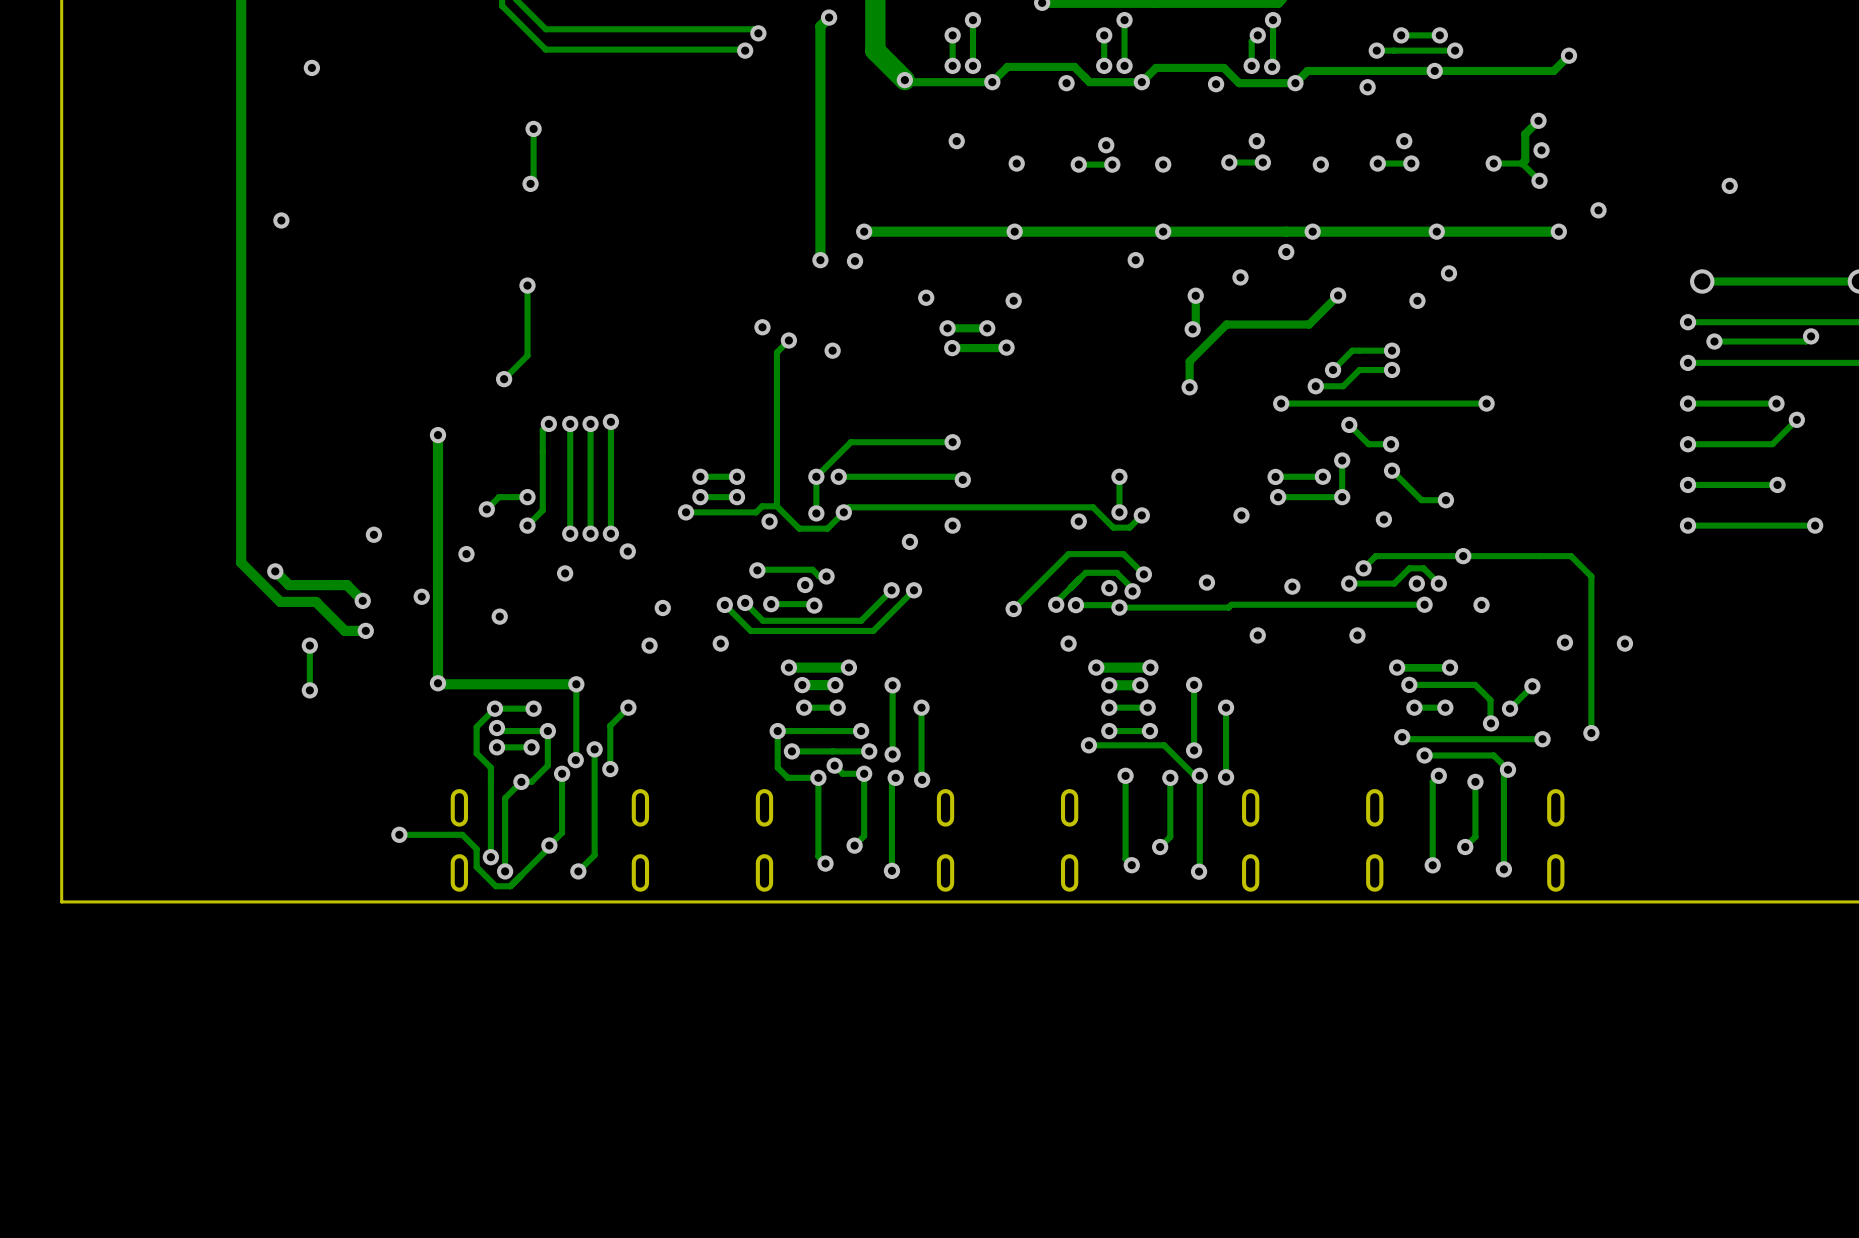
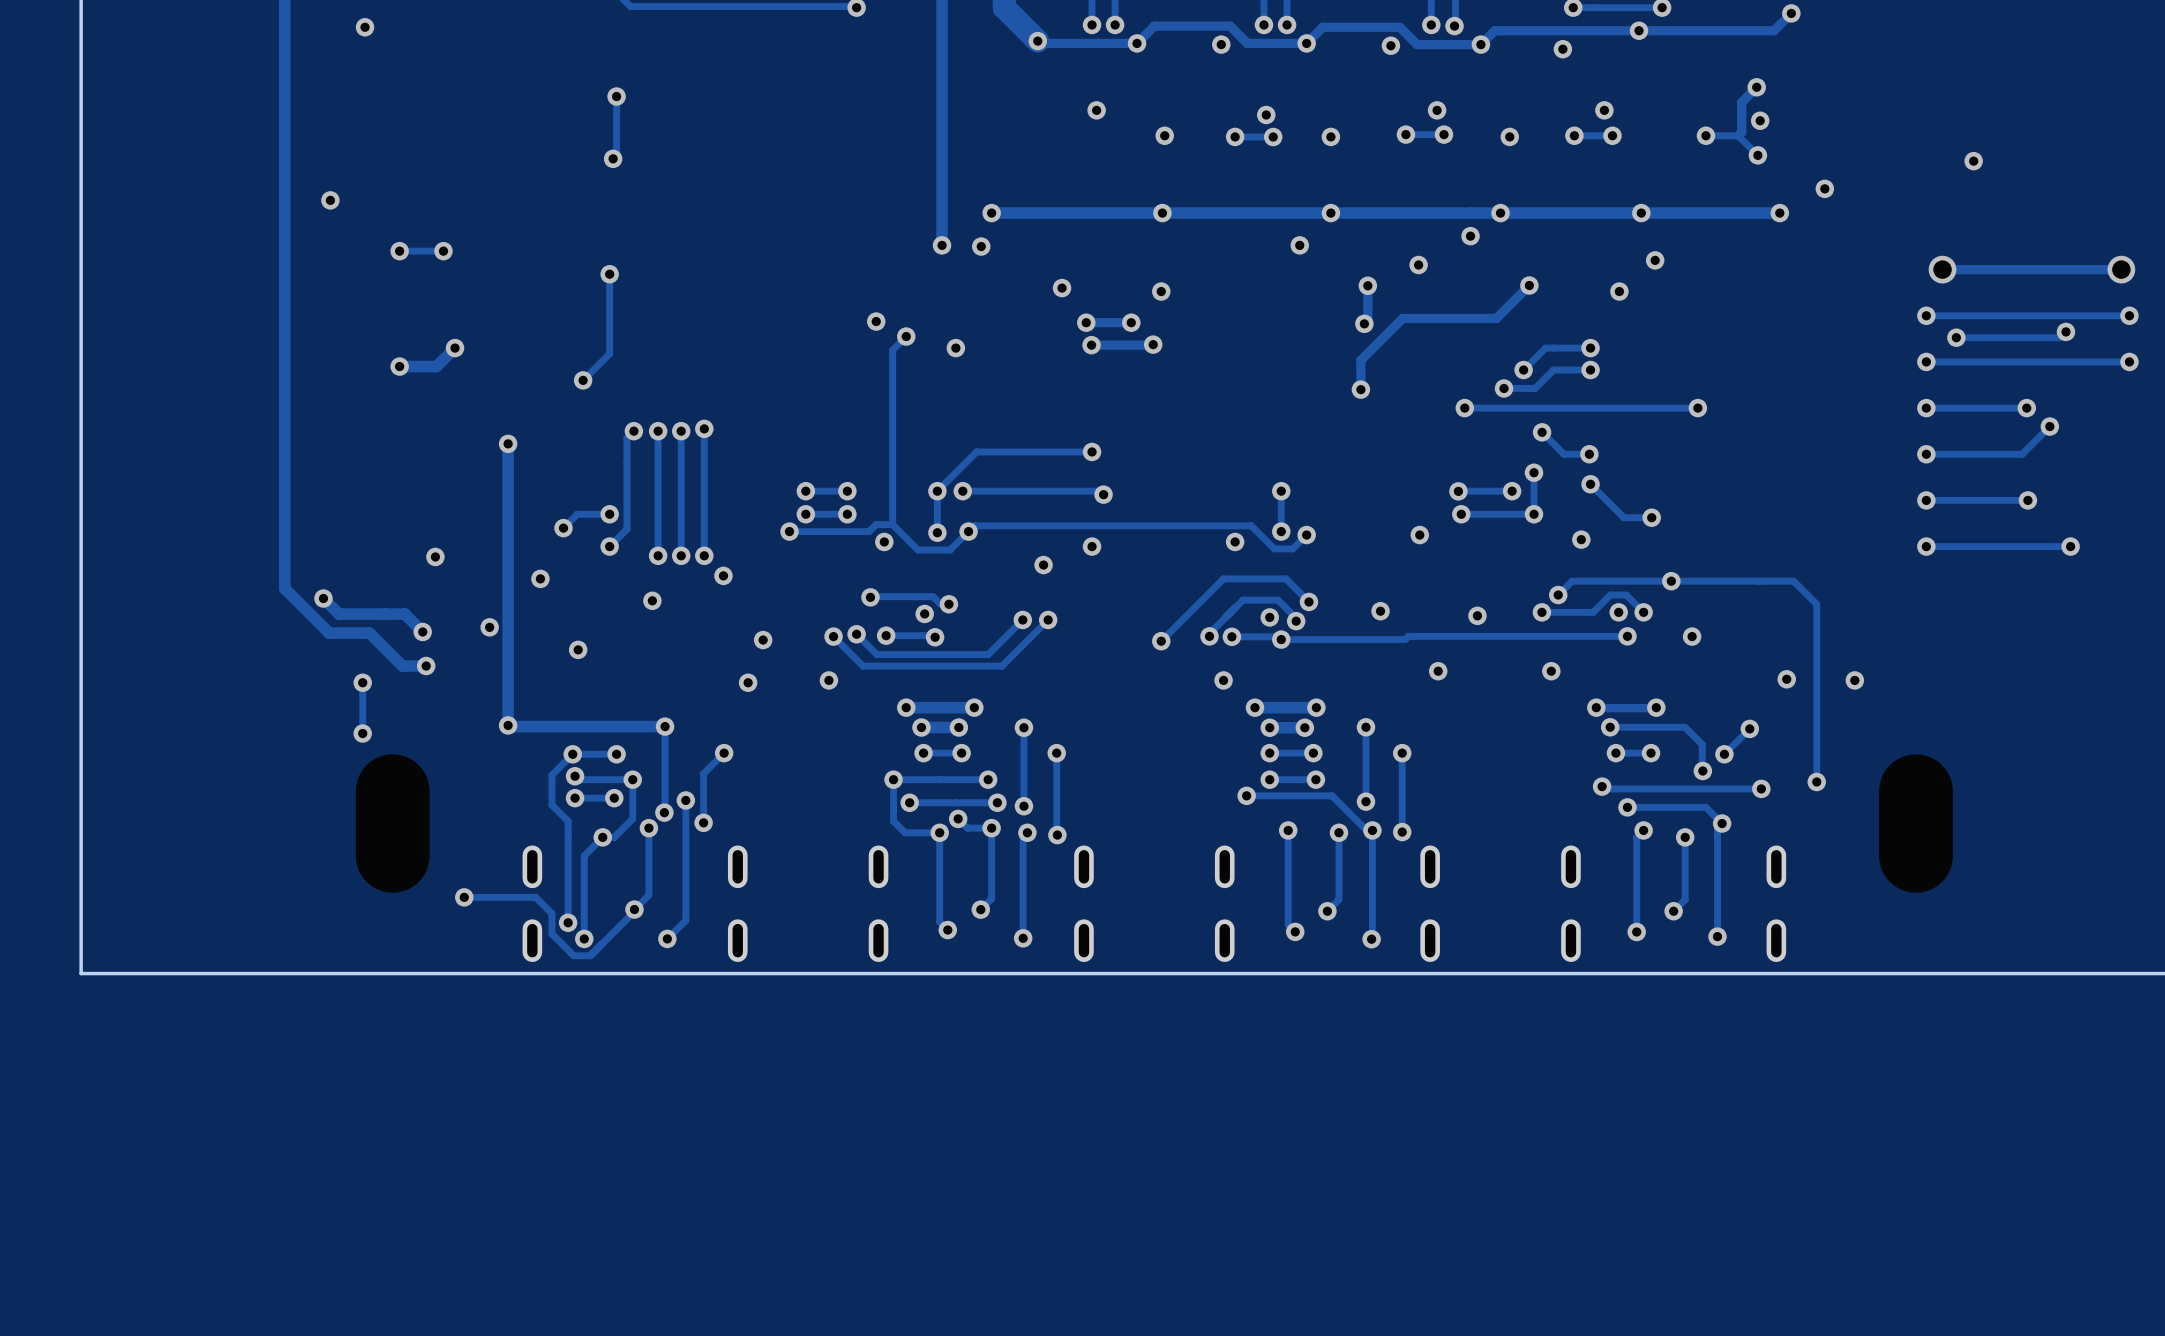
via: none -> (399, 251)
track: none -> (443, 251) (399, 251)
via: none -> (443, 251)
track: none -> (455, 348) (436, 366) (399, 366)
via: none -> (455, 348)
via: none -> (399, 366)

